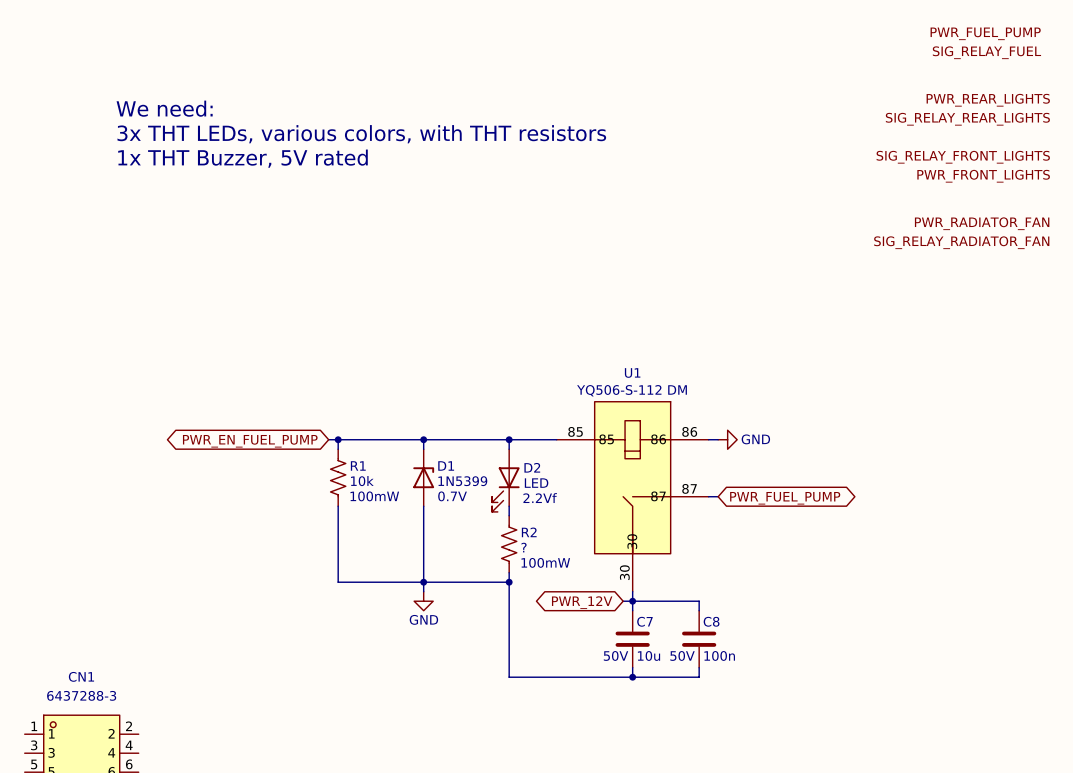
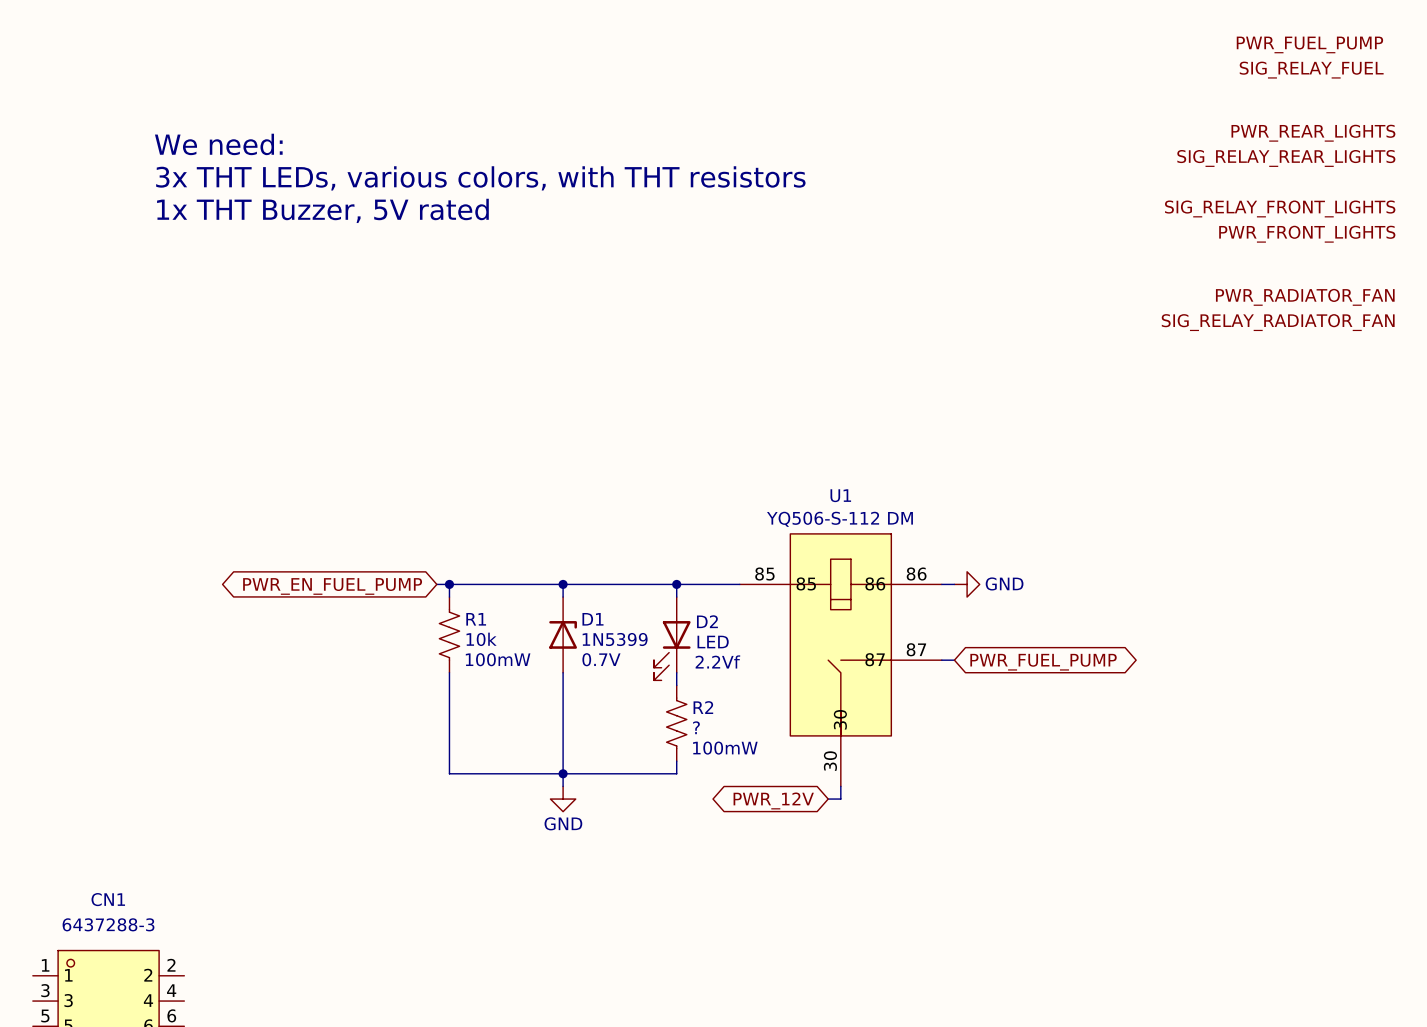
wire: (509, 582) (509, 677) (699, 677) (699, 667) -> none
junction: (509, 582) -> none
junction: (632, 601) -> none
wire: (632, 610) (632, 601) (699, 601) (699, 610) -> none
C7: 10u (632, 639) -> none
C8: 100n (699, 639) -> none
wire: (632, 667) (632, 677) -> none
junction: (632, 677) -> none

